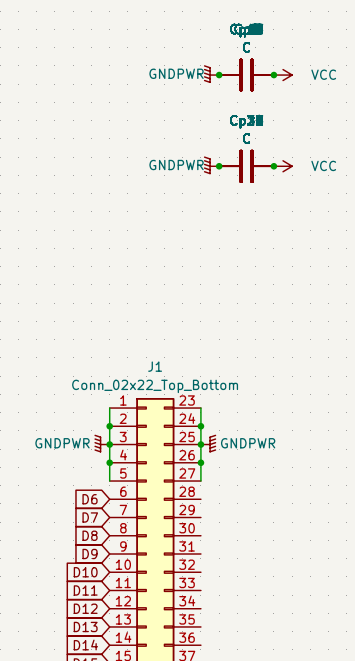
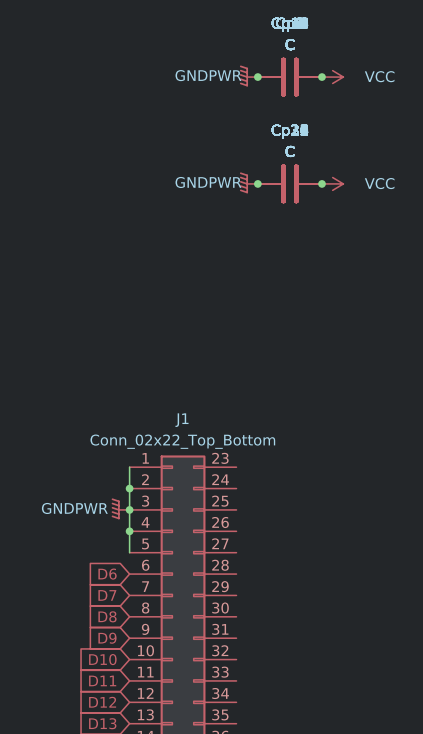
wire: (200, 408) (200, 481) -> none
junction: (200, 426) -> none
power symbol: GNDPWR (208, 443) -> none
junction: (200, 444) -> none
junction: (200, 462) -> none

